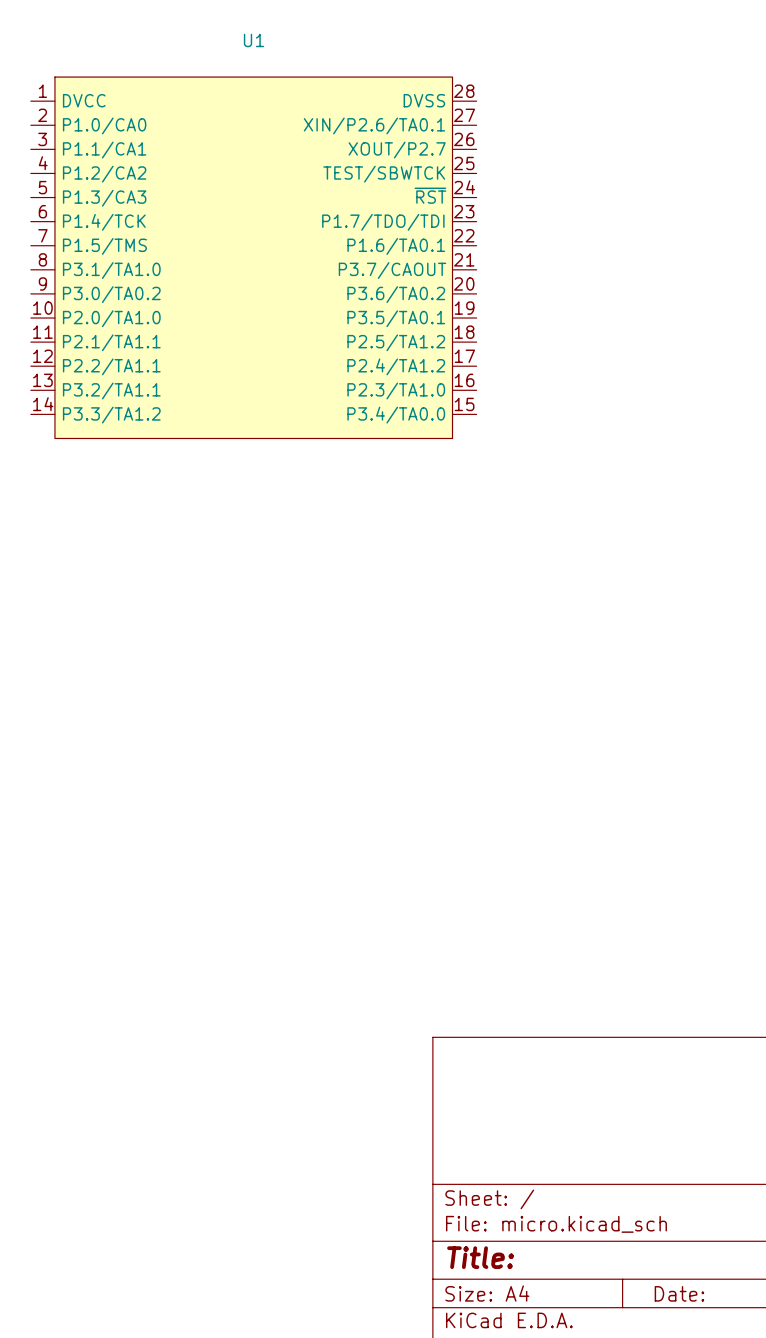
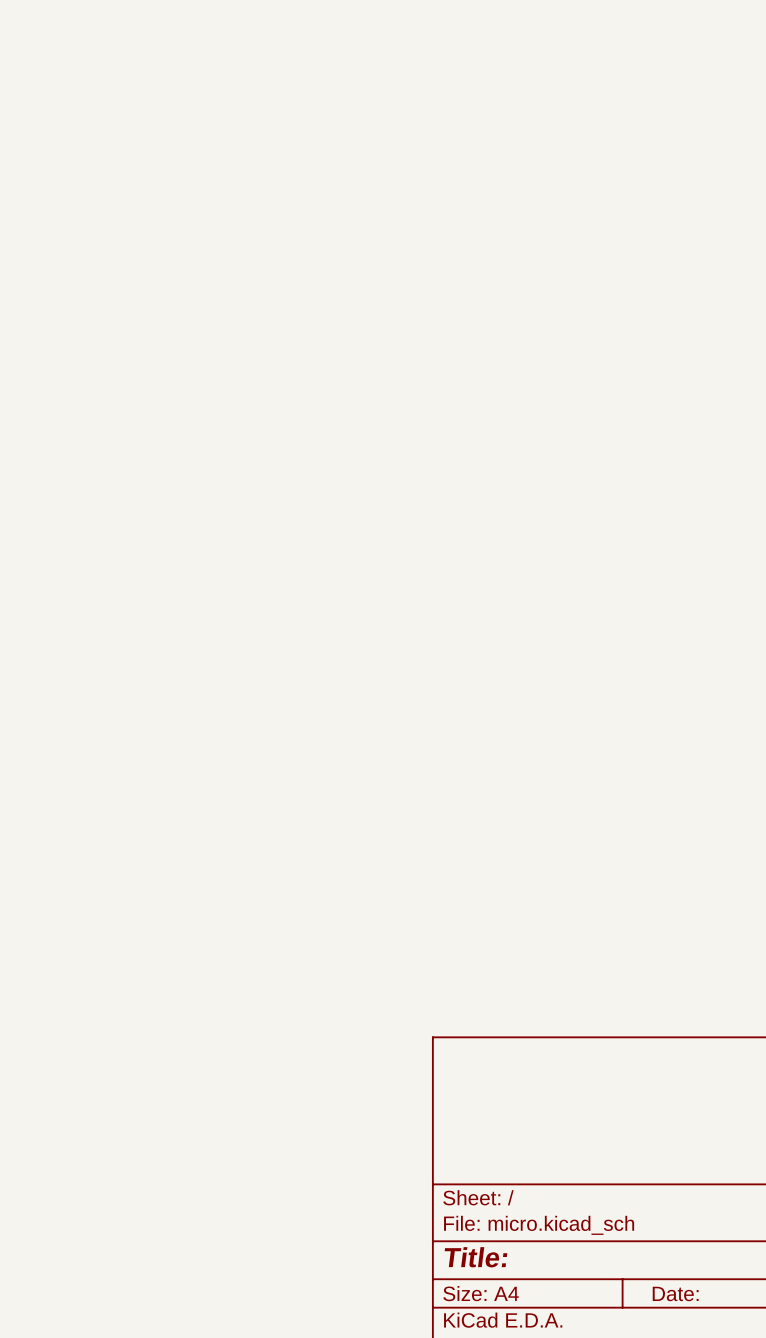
U1: (253, 257) -> none

